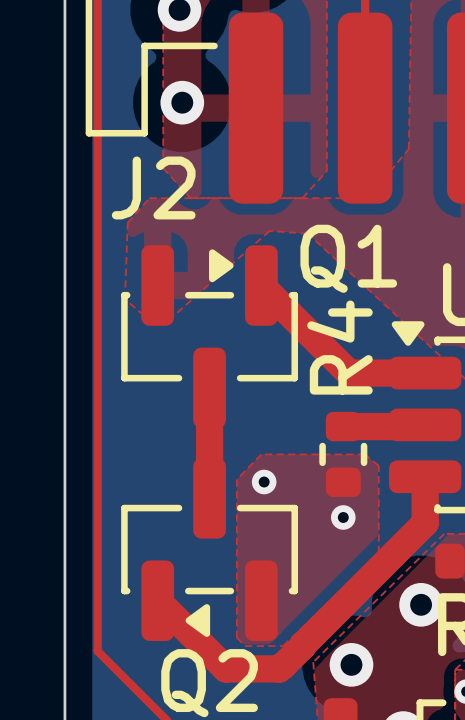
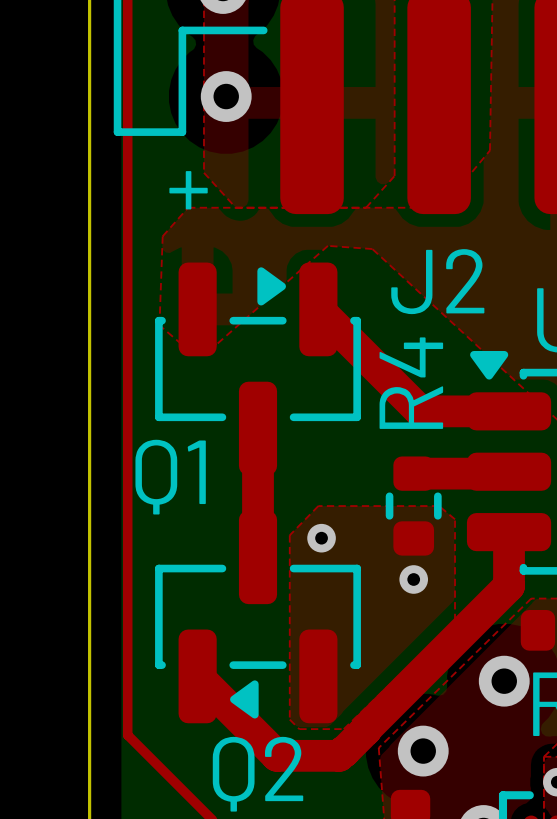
J2 name position: J2 (153, 187) -> J2 (437, 281)
text: none -> + (188, 190)
Q1 name position: Q1 (348, 258) -> Q1 (170, 477)

